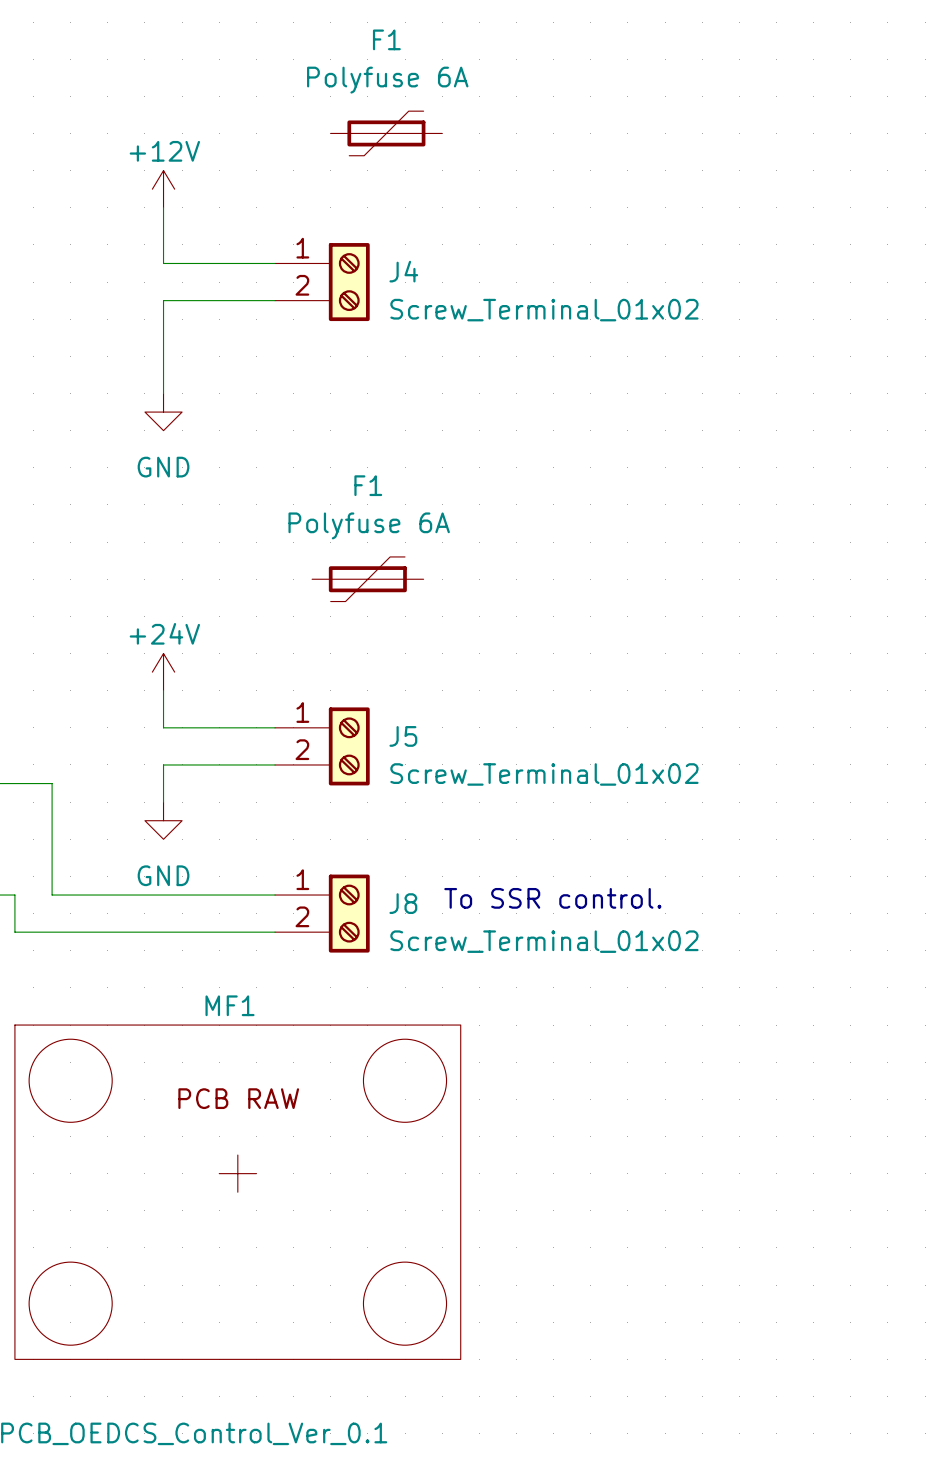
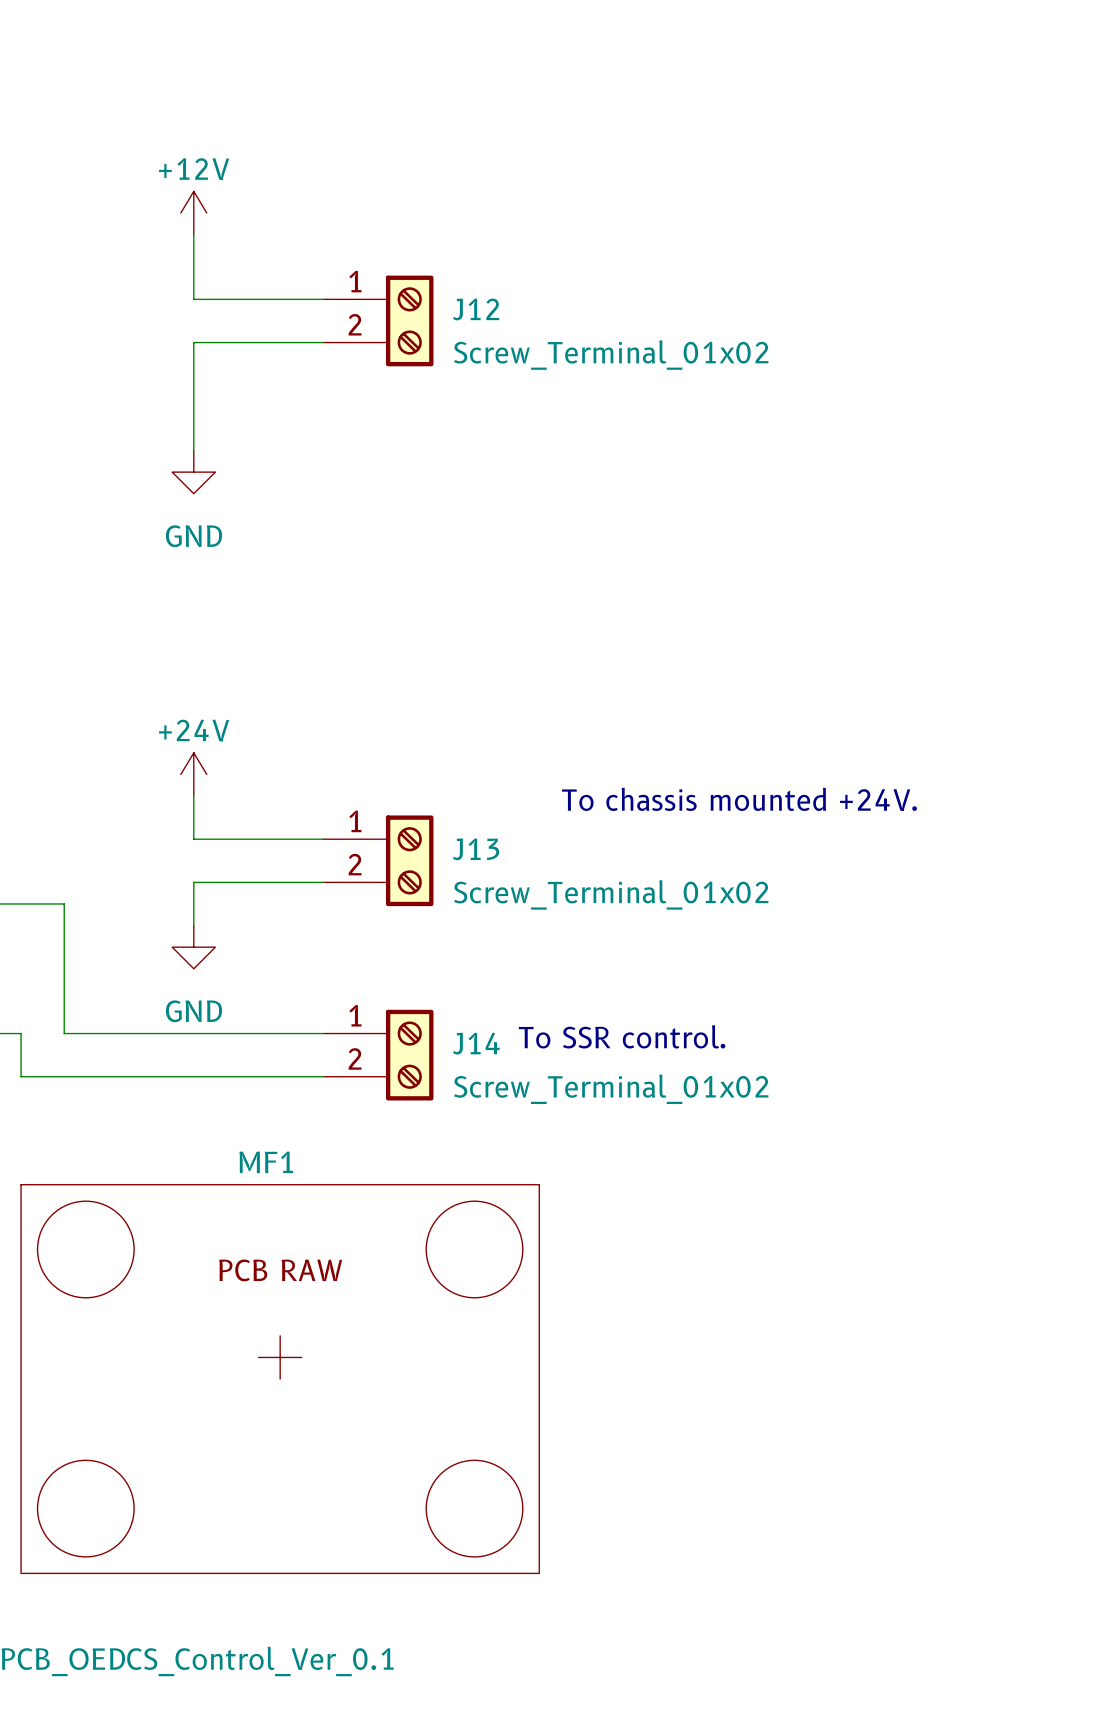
F1: Polyfuse 6A (386, 133) -> none
J4 name: J4 (403, 271) -> J12 (476, 309)
F1: Polyfuse 6A (367, 579) -> none
text: none -> To chassis mounted +24V. (739, 799)
J5 name: J5 (403, 736) -> J13 (476, 849)
J8 name: J8 (403, 903) -> J14 (476, 1043)

